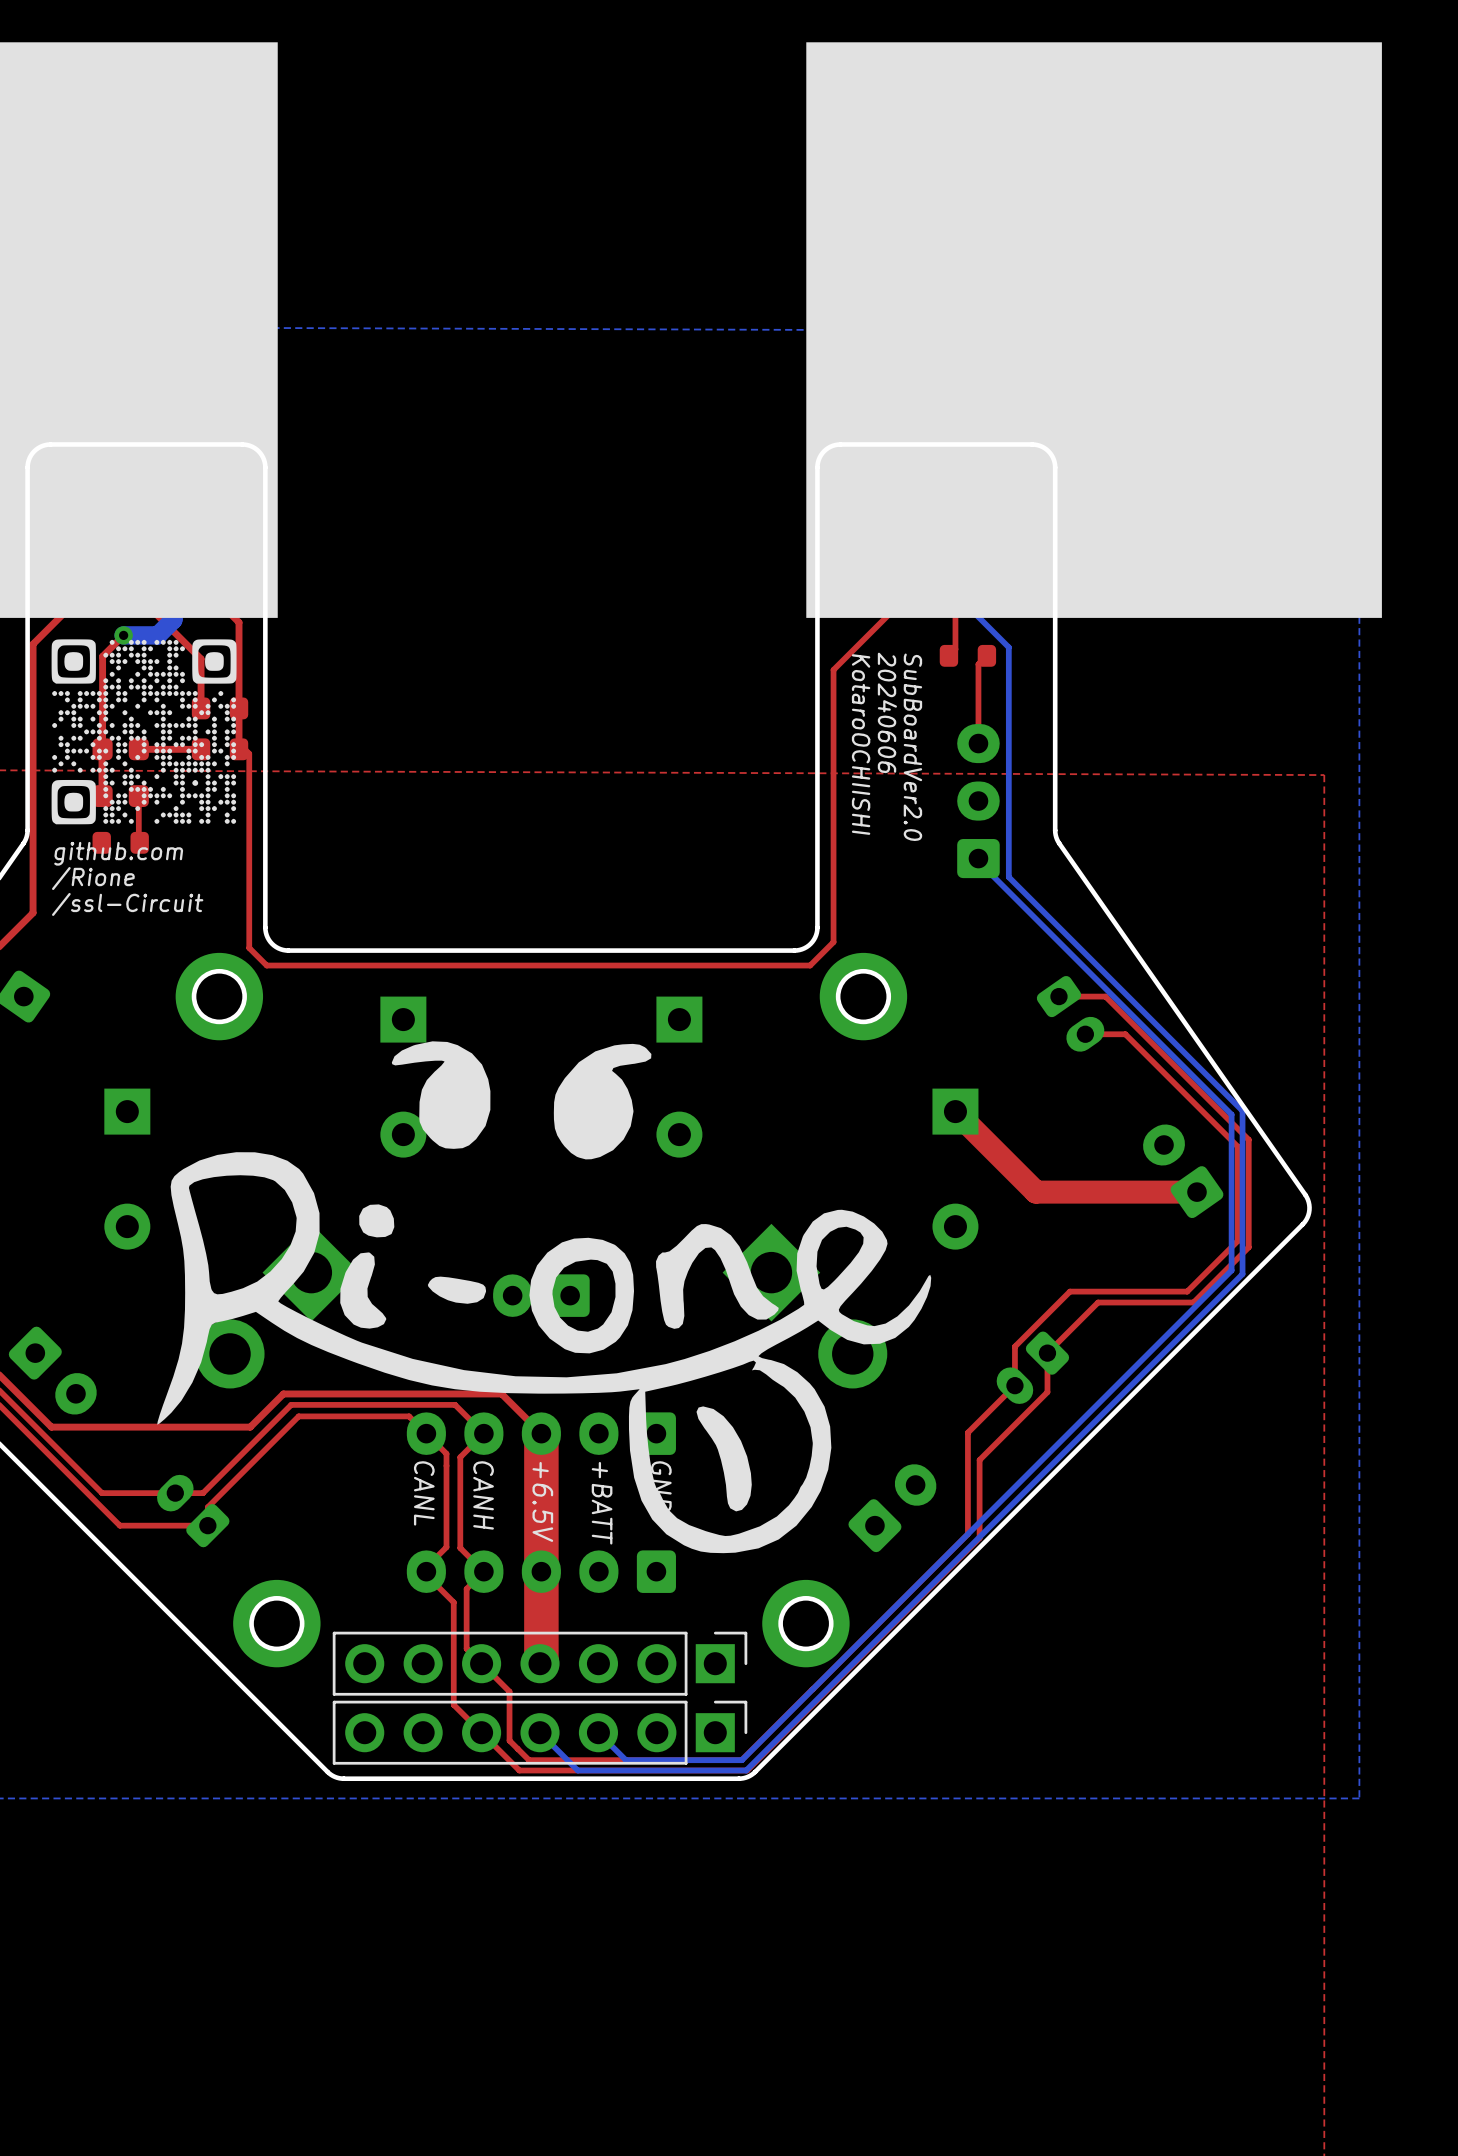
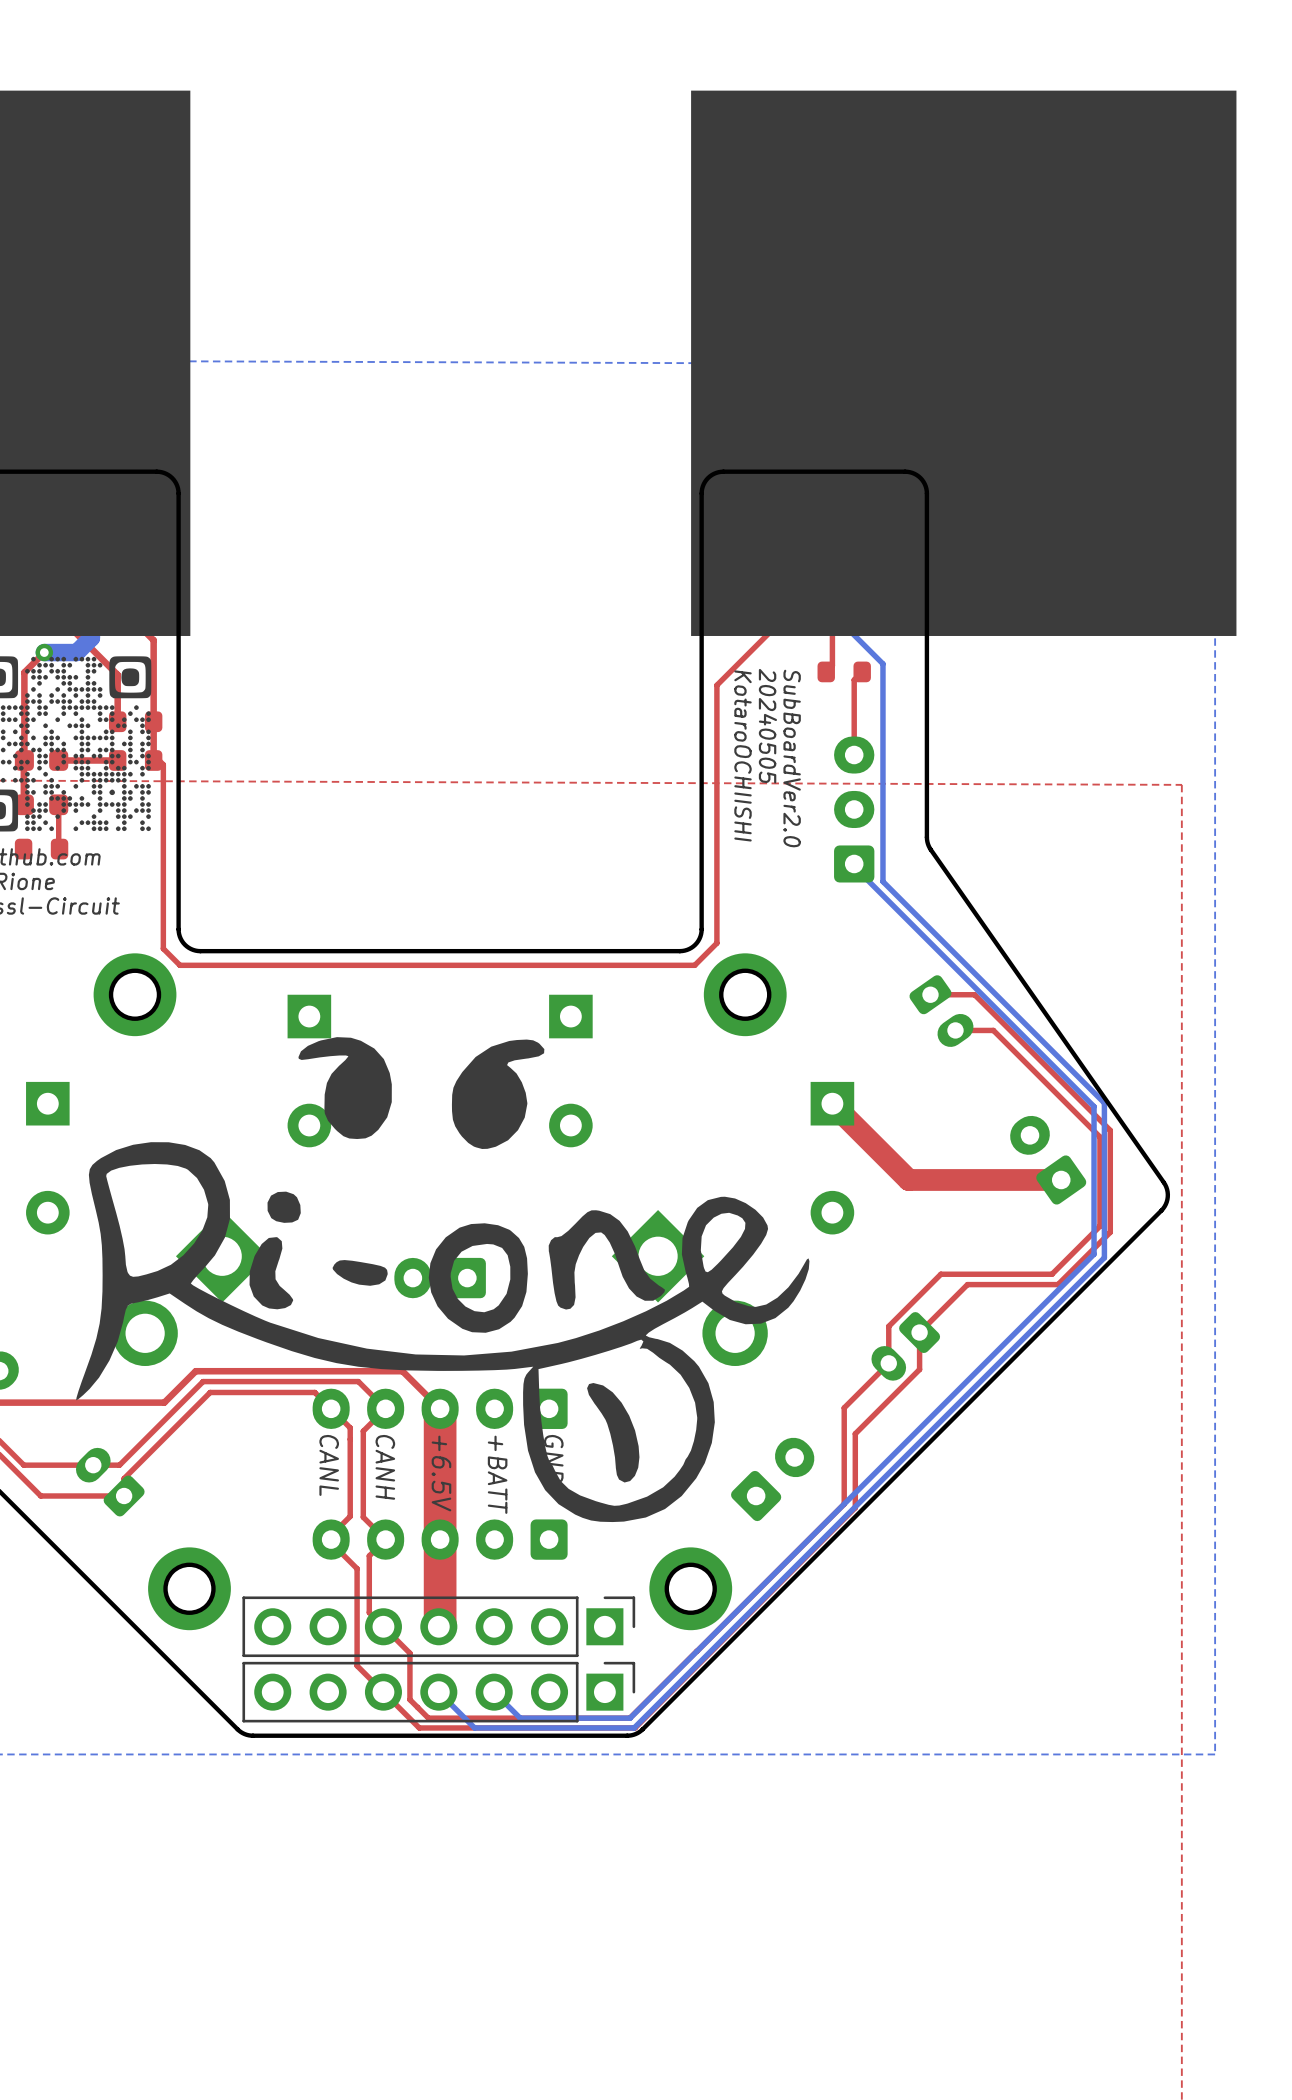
text: 20240606 (887, 712) -> 20240505 (767, 726)

